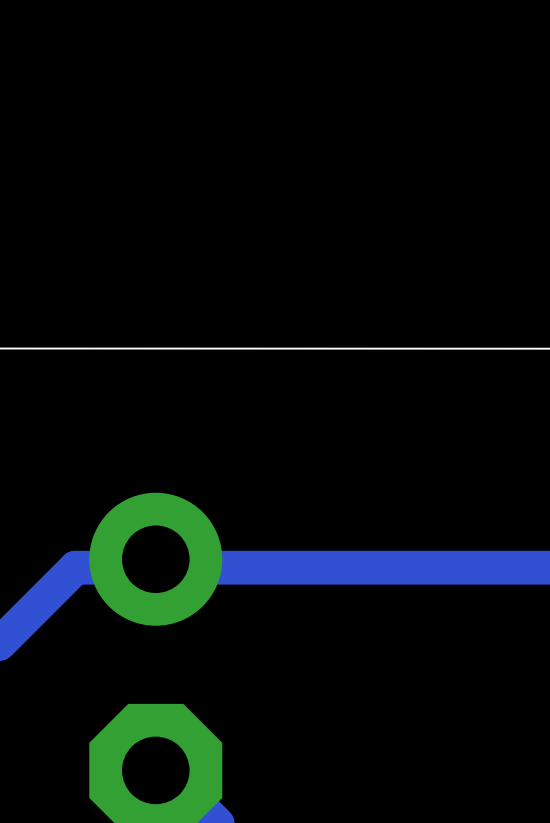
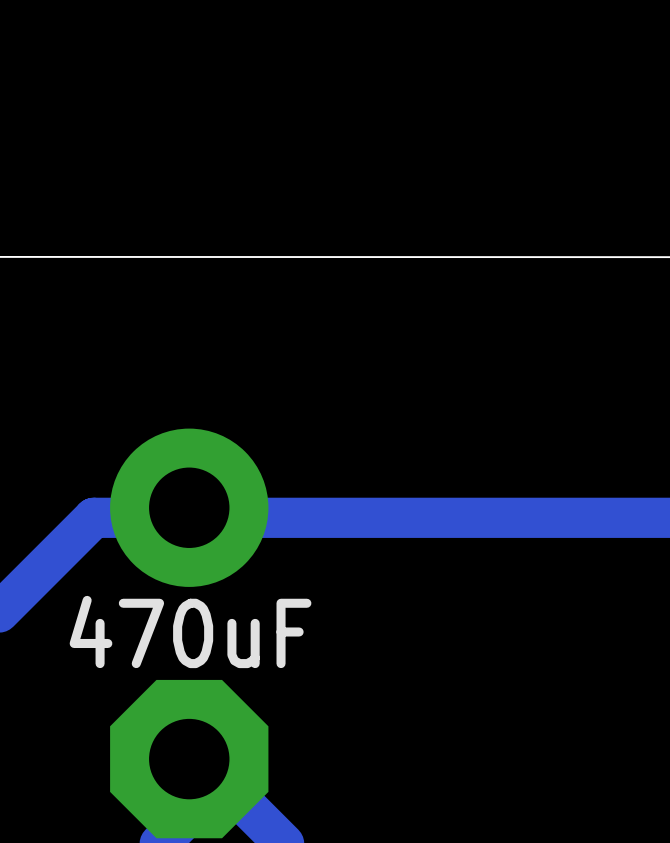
text: none -> 470uF (190, 631)

